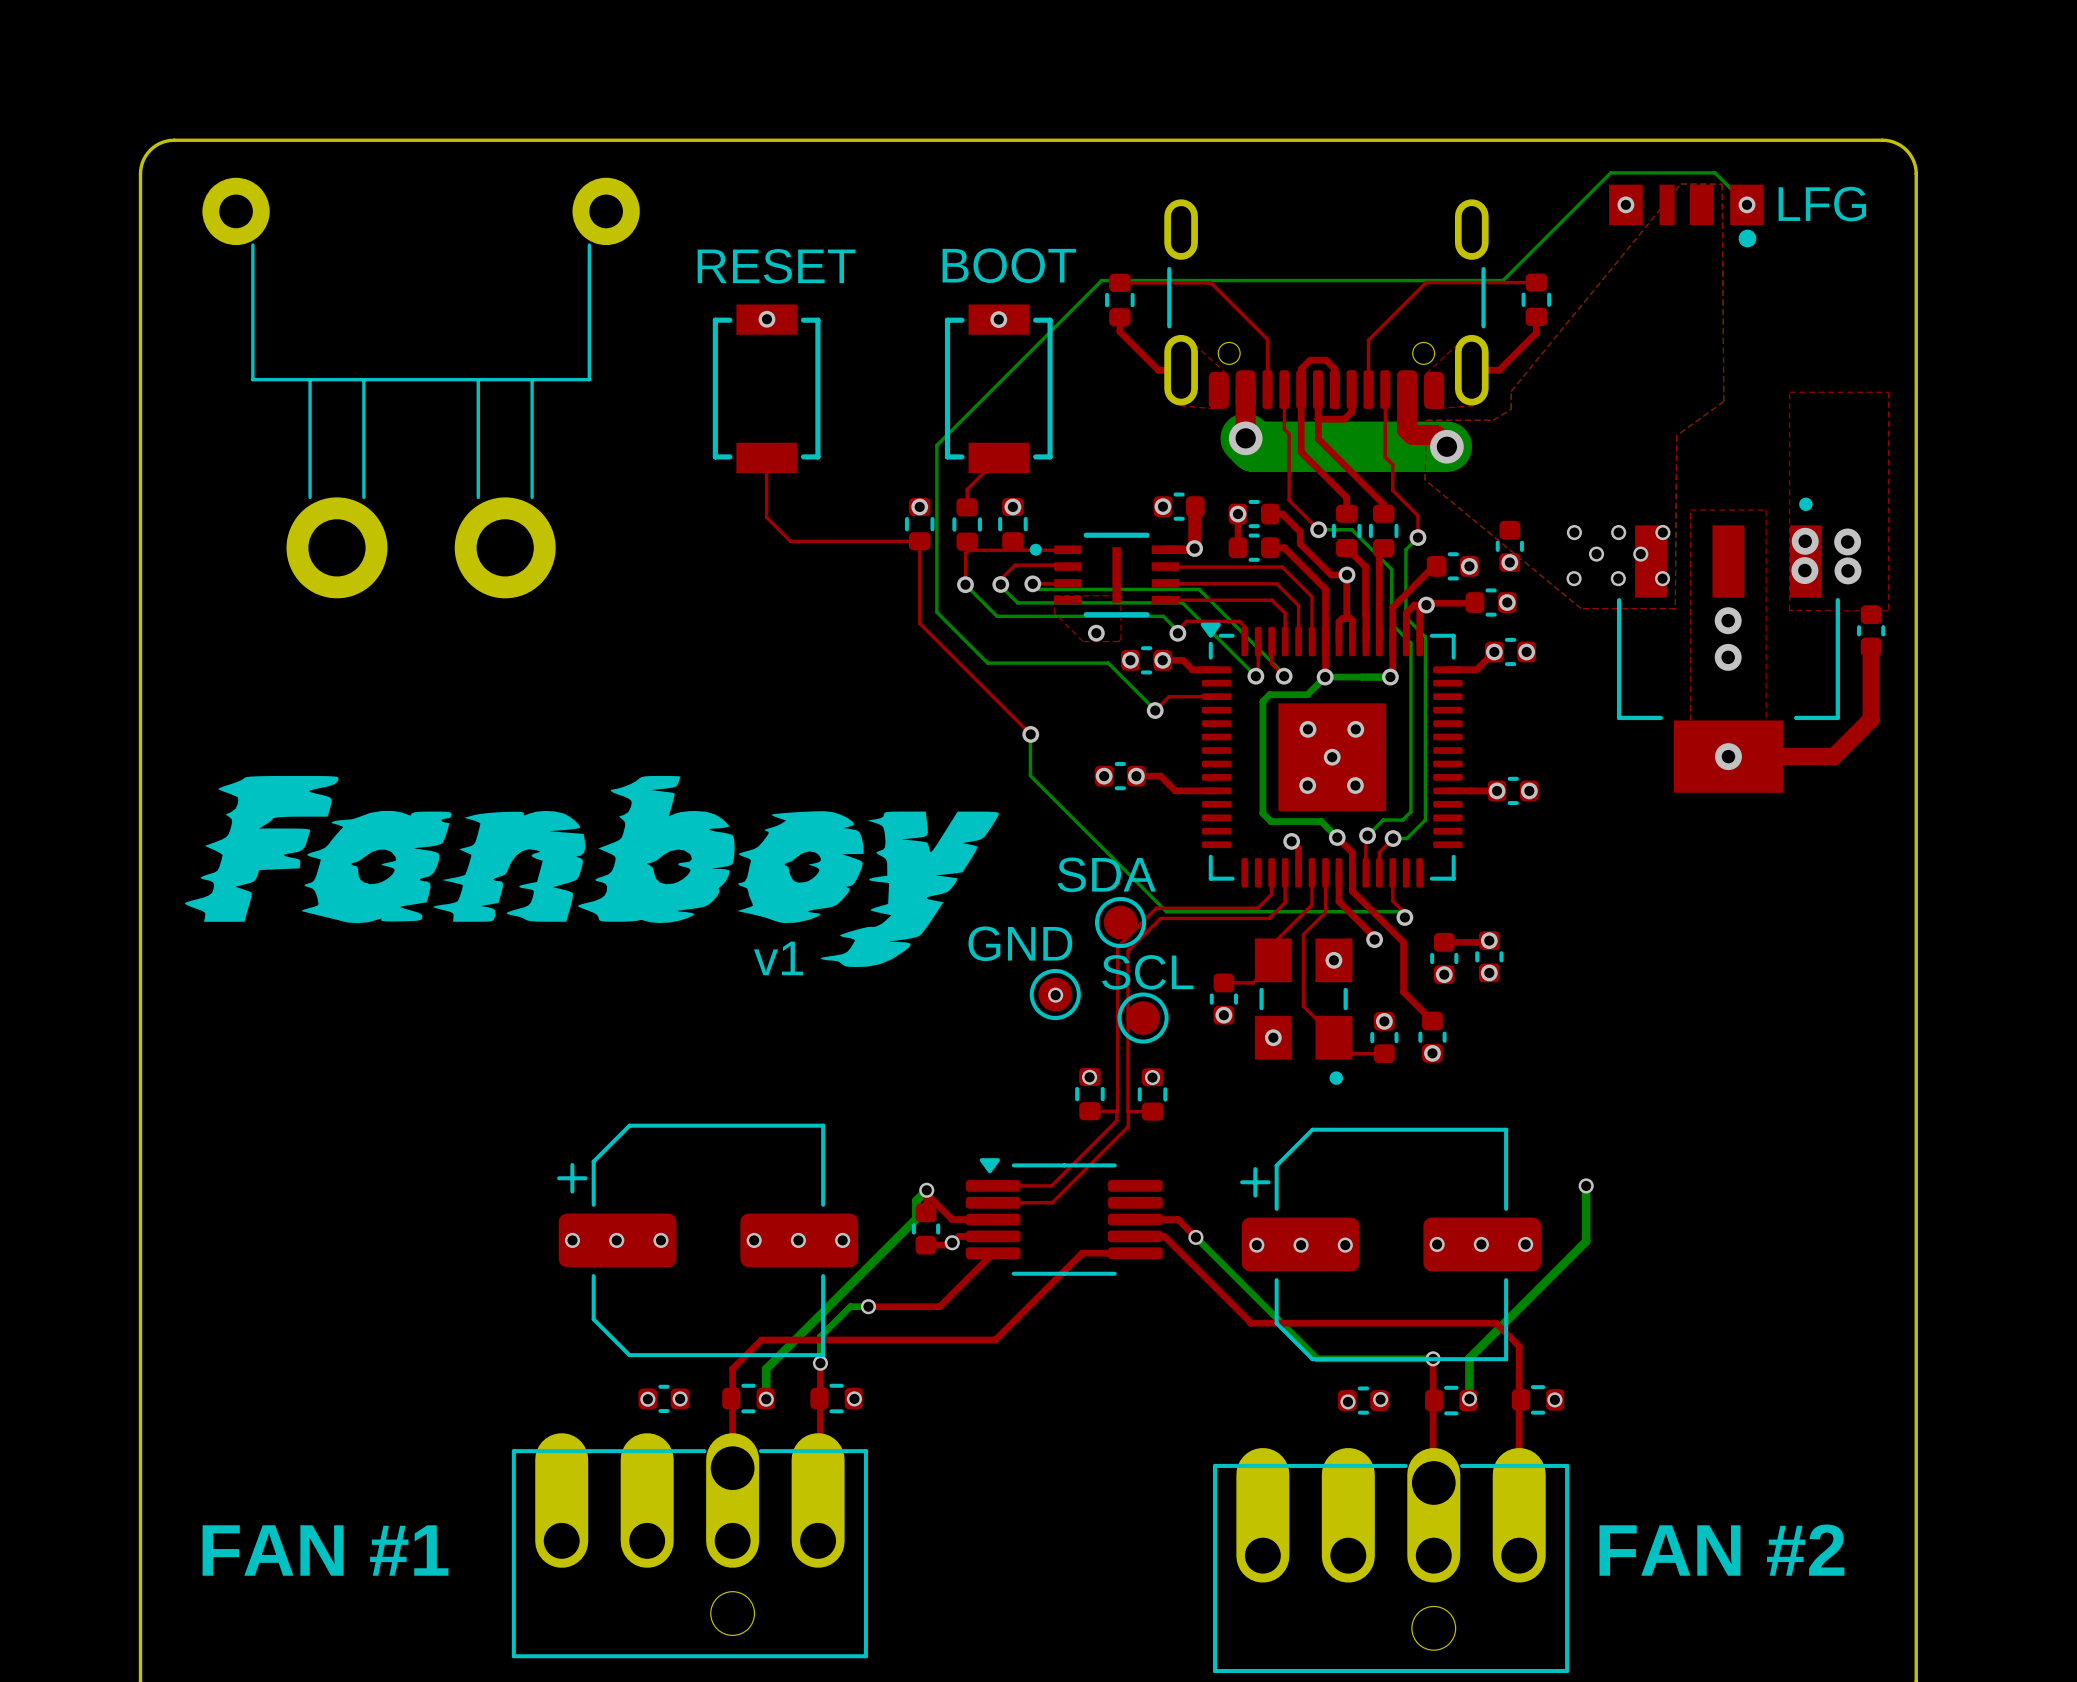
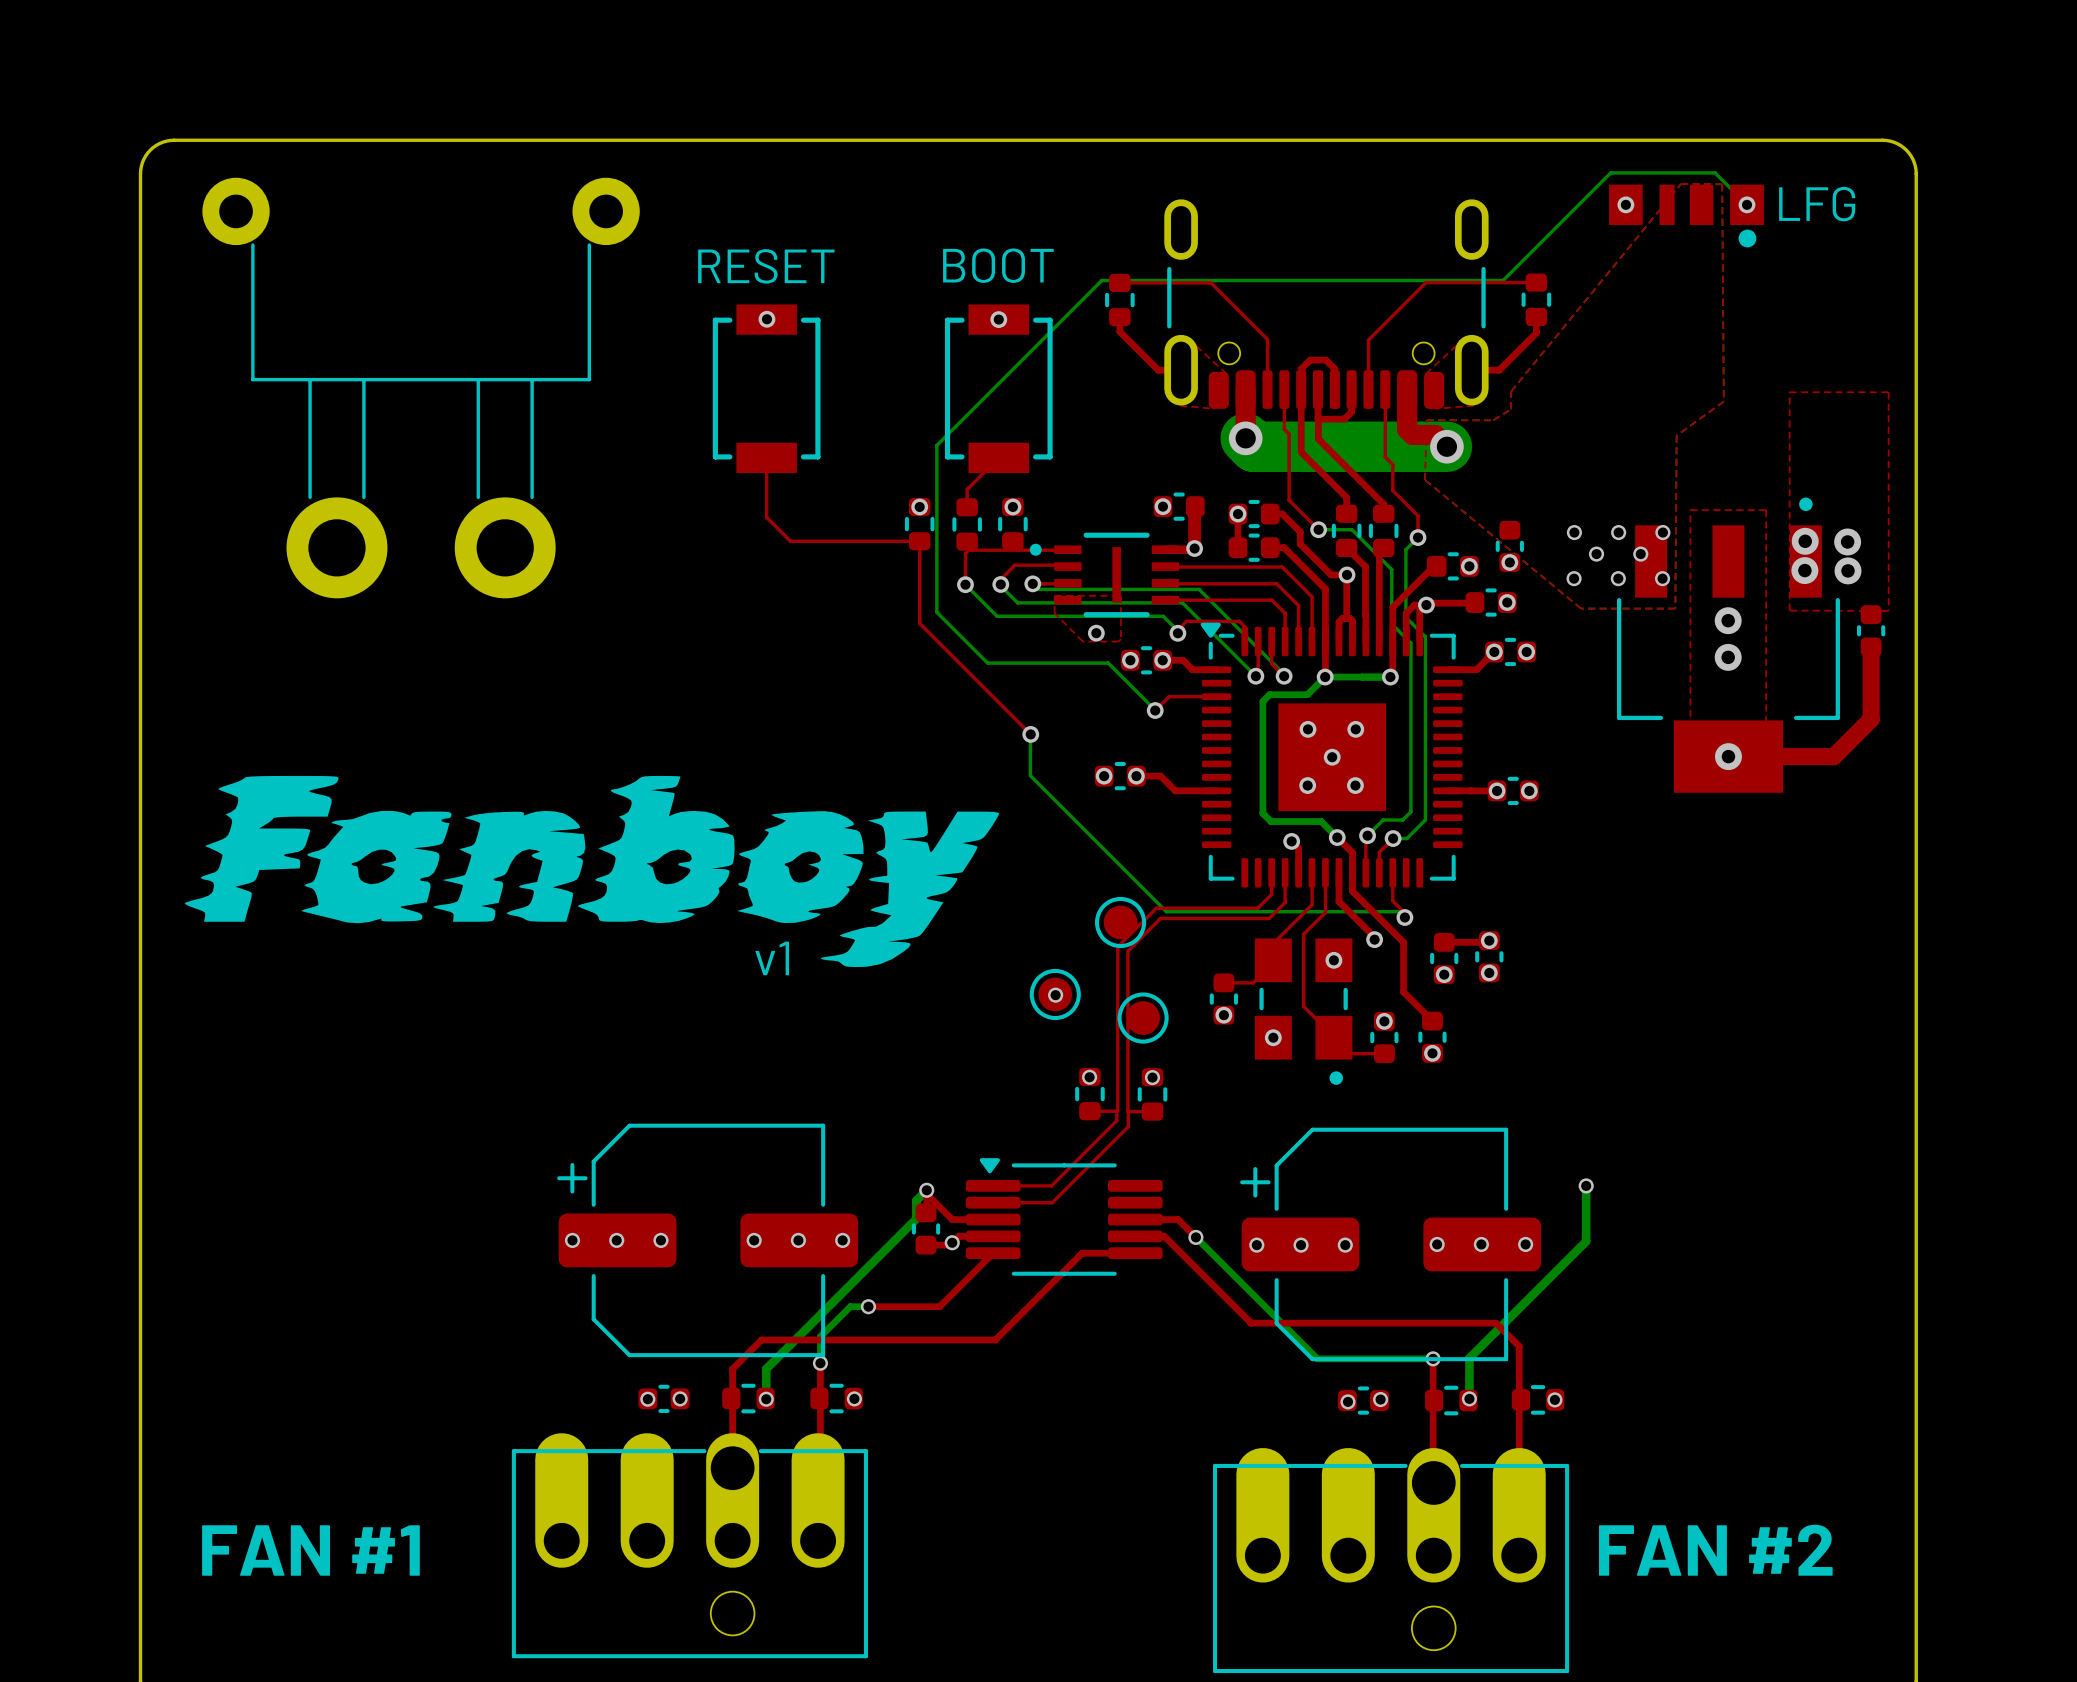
part value: SDA (1106, 874) -> none
part value: GND (1020, 943) -> none
part value: SCL (1147, 972) -> none

